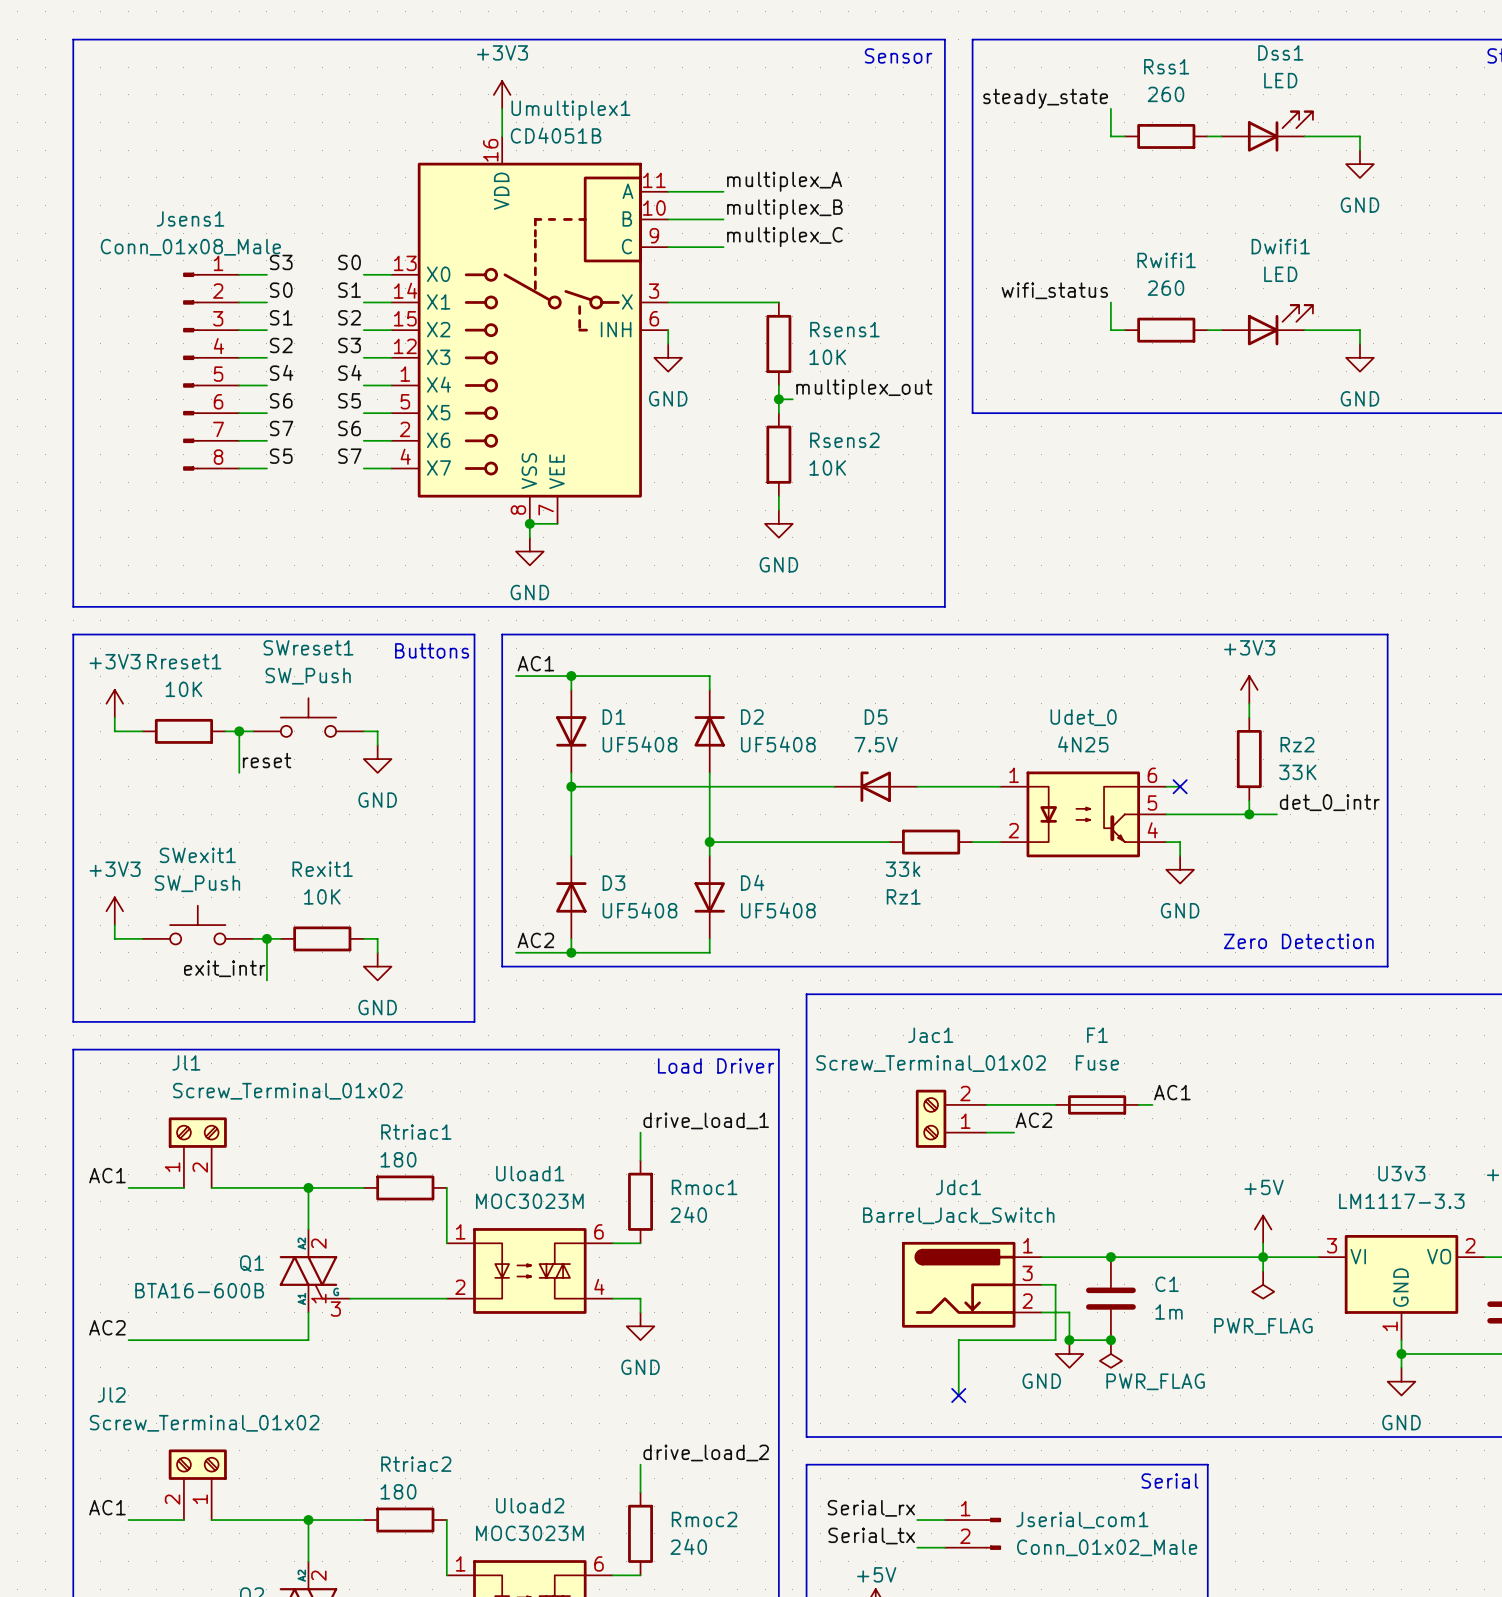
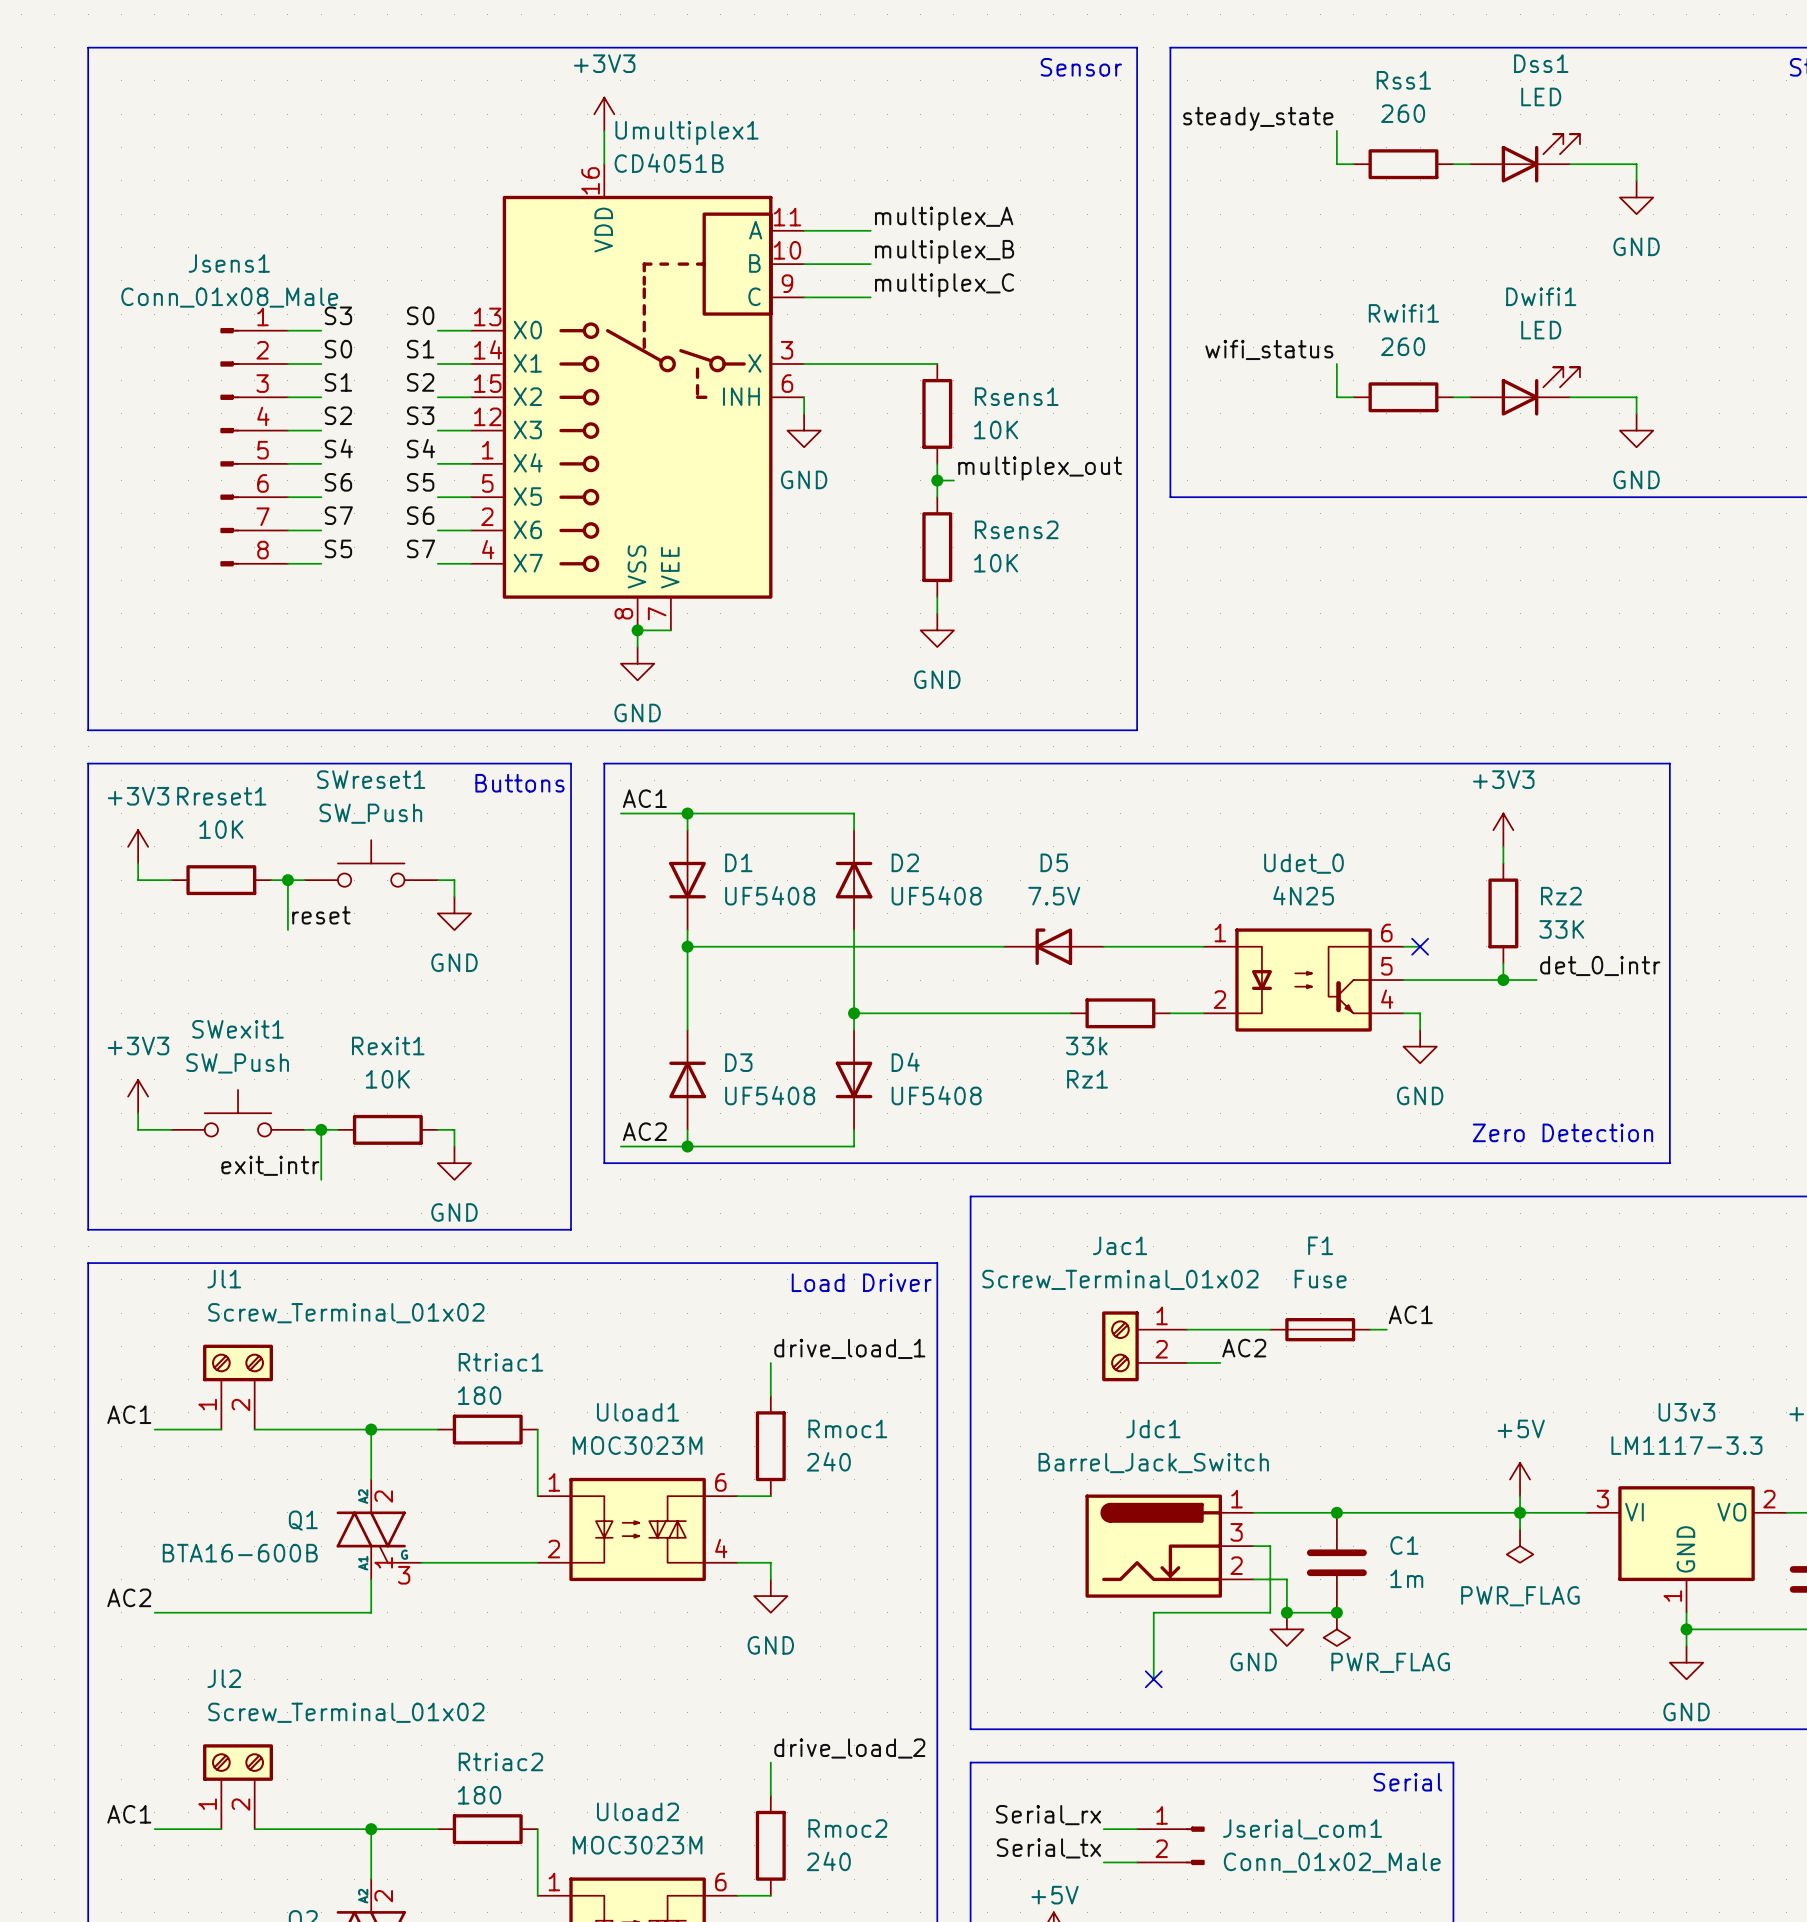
Jac1 flip: as is (931, 1118) -> up-down (1120, 1346)
Jl2 name position: Jl2 (111, 1394) -> Jl2 (224, 1678)
Jl2 value position: Screw_Terminal_01x02 (204, 1423) -> Screw_Terminal_01x02 (346, 1712)
Jl2 flip: as is (197, 1464) -> left-right (238, 1762)

